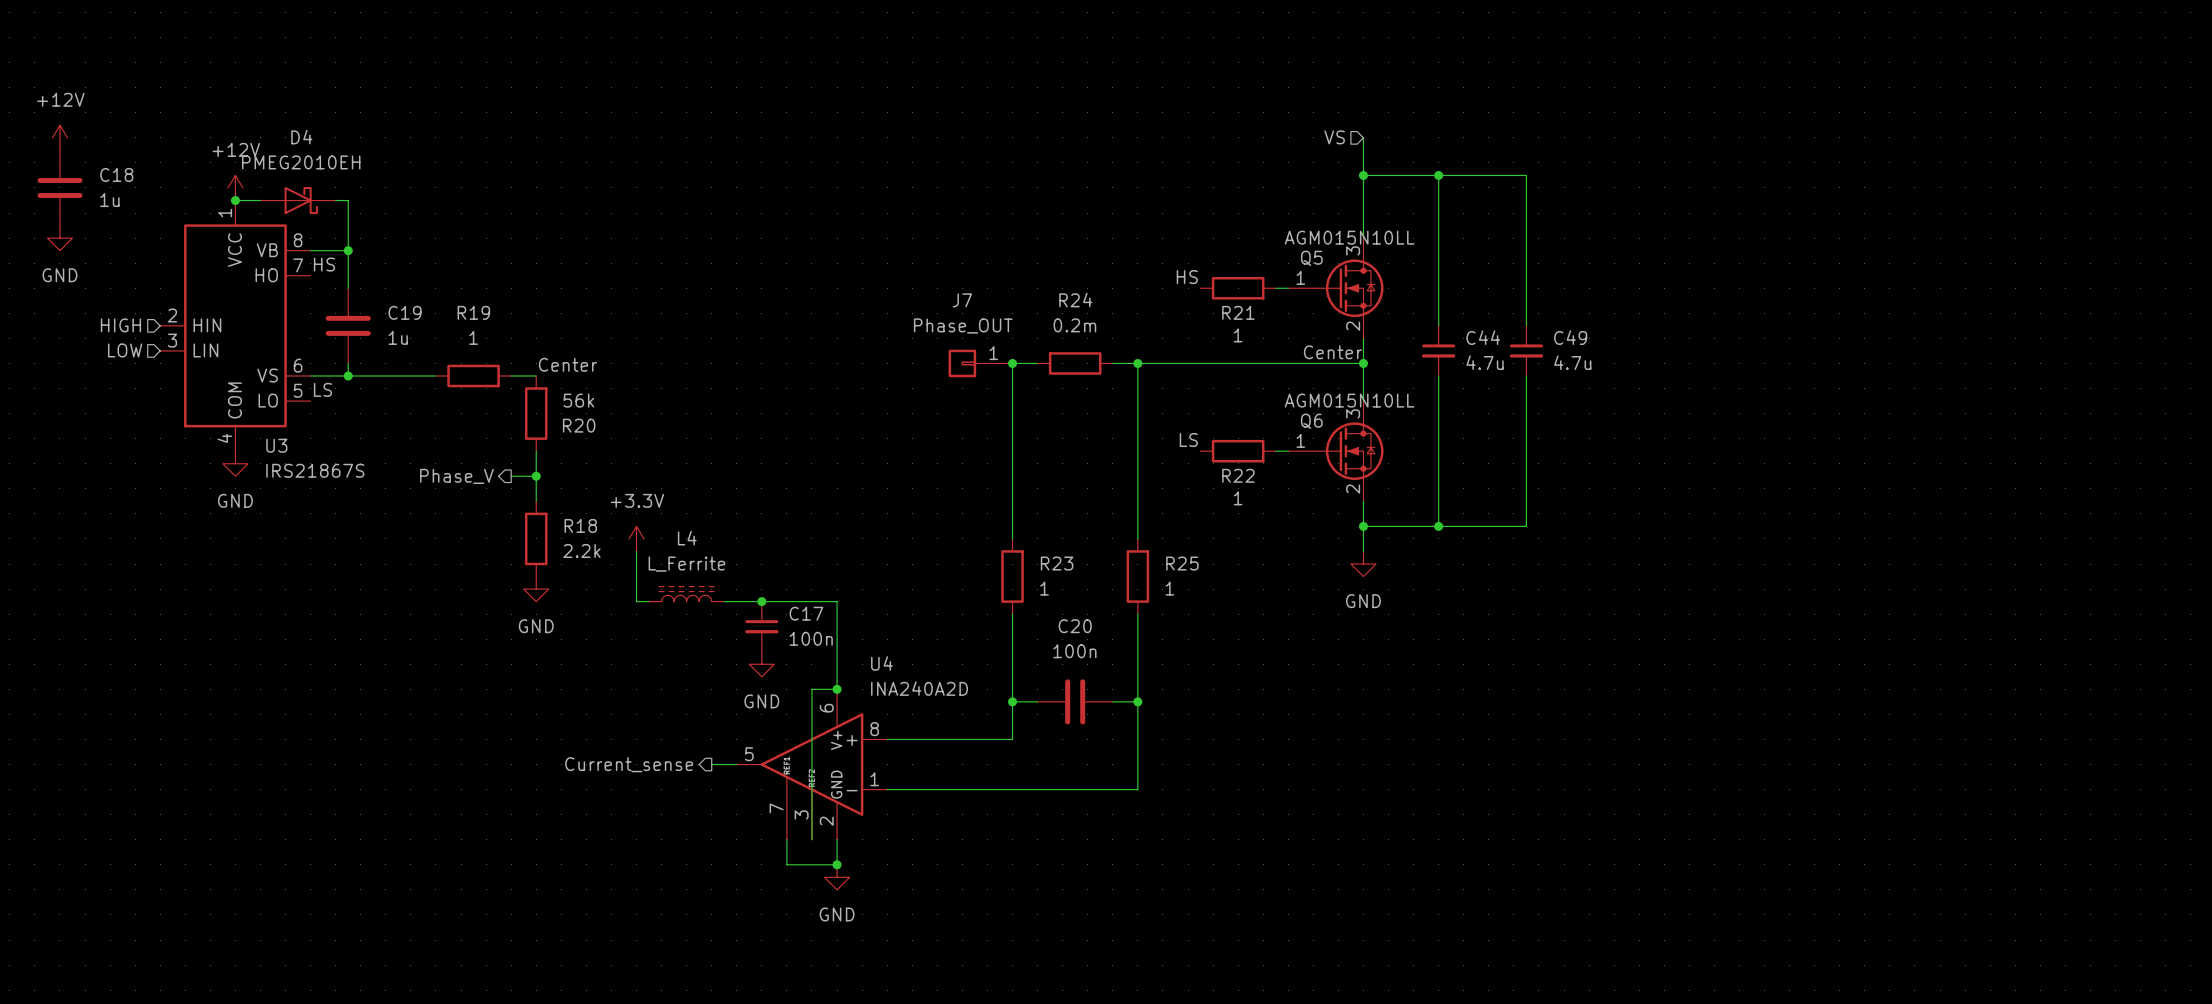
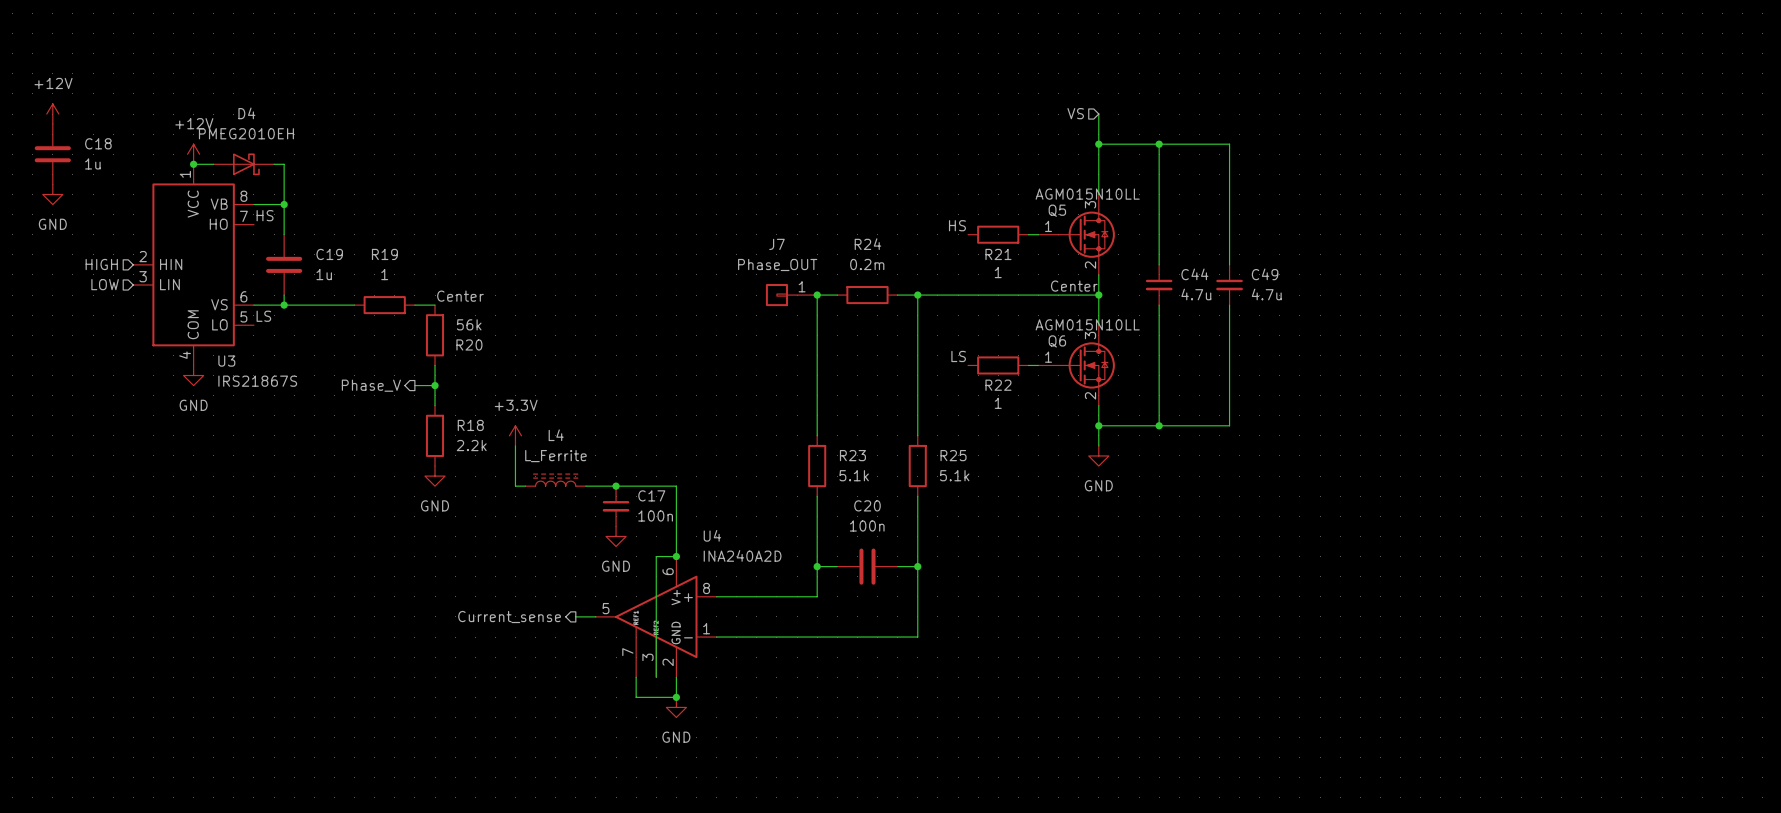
R23 value: 1 (1044, 588) -> 5.1k (854, 475)
R25 value: 1 (1169, 588) -> 5.1k (954, 475)

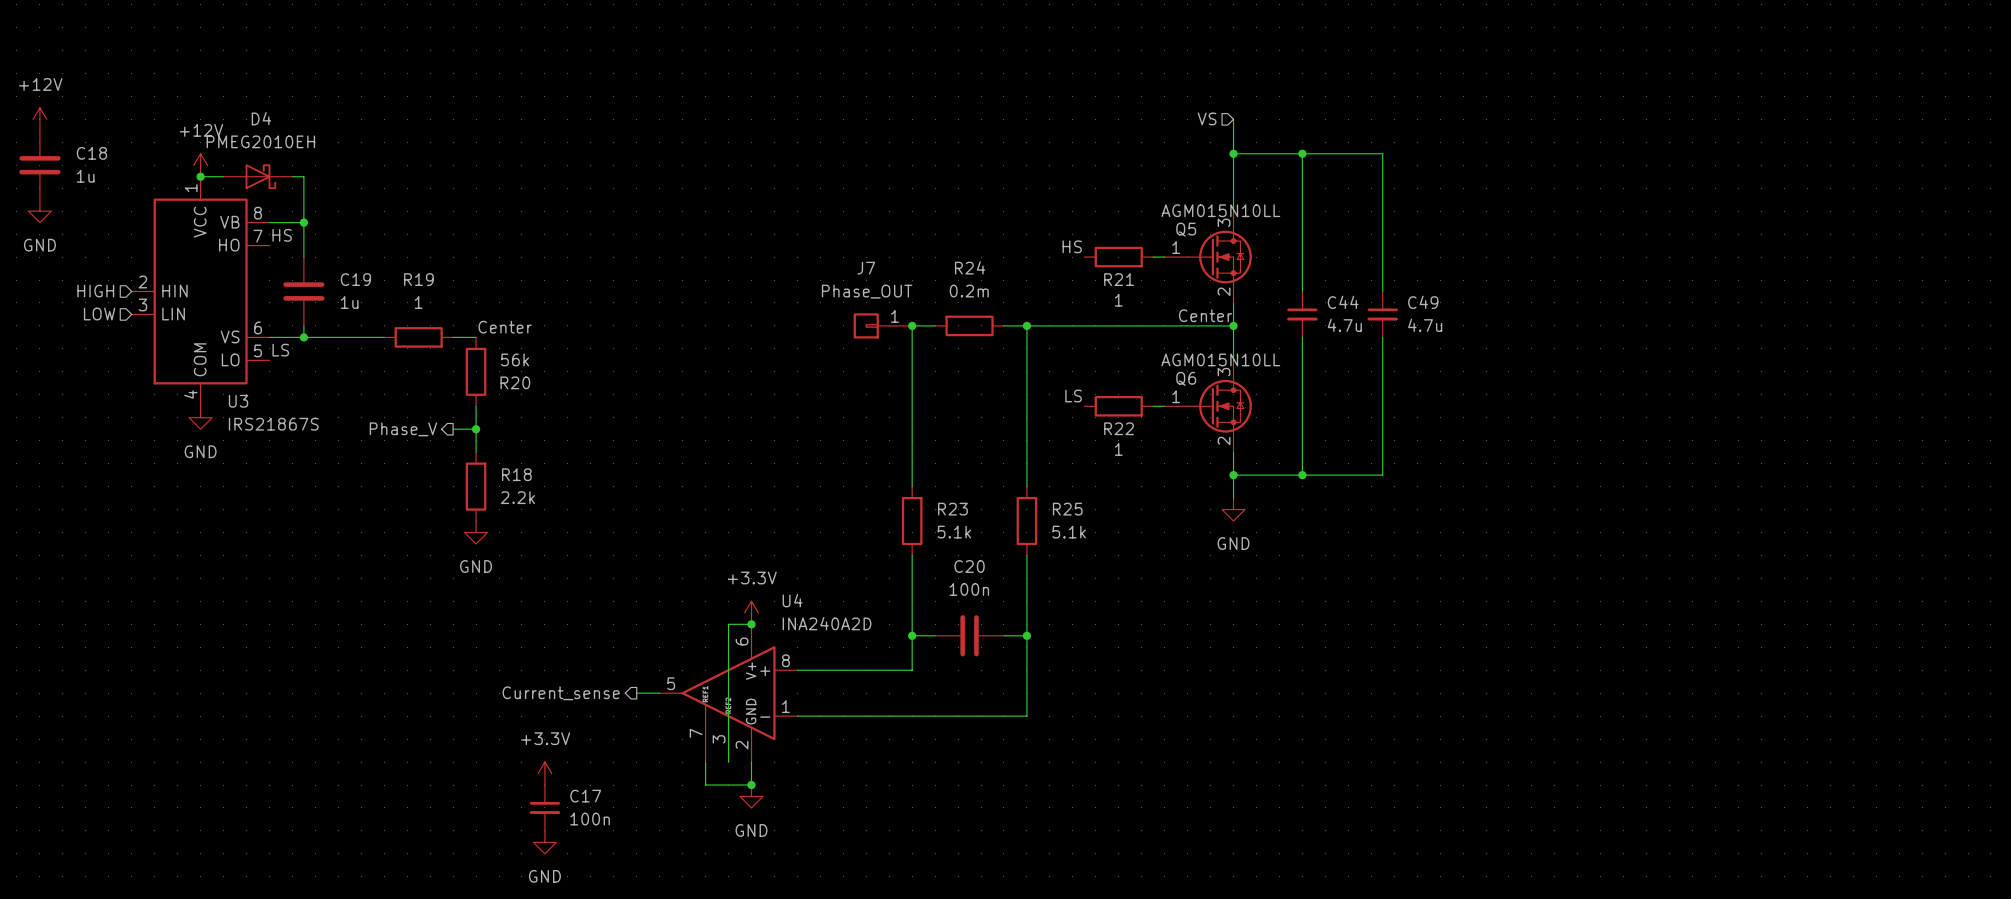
power symbol: +3.3V (515, 435) -> none
wire: (515, 445) (515, 486) (525, 486) -> none
L4: L_Ferrite (555, 480) -> none
wire: (585, 486) (676, 486) (676, 556) -> none
junction: (616, 486) -> none
C17 position: (616, 506) -> (544, 807)
power symbol: GND (616, 536) -> none
power symbol: none -> +3.3V (751, 612)
power symbol: none -> +3.3V (544, 773)
power symbol: none -> GND (544, 842)

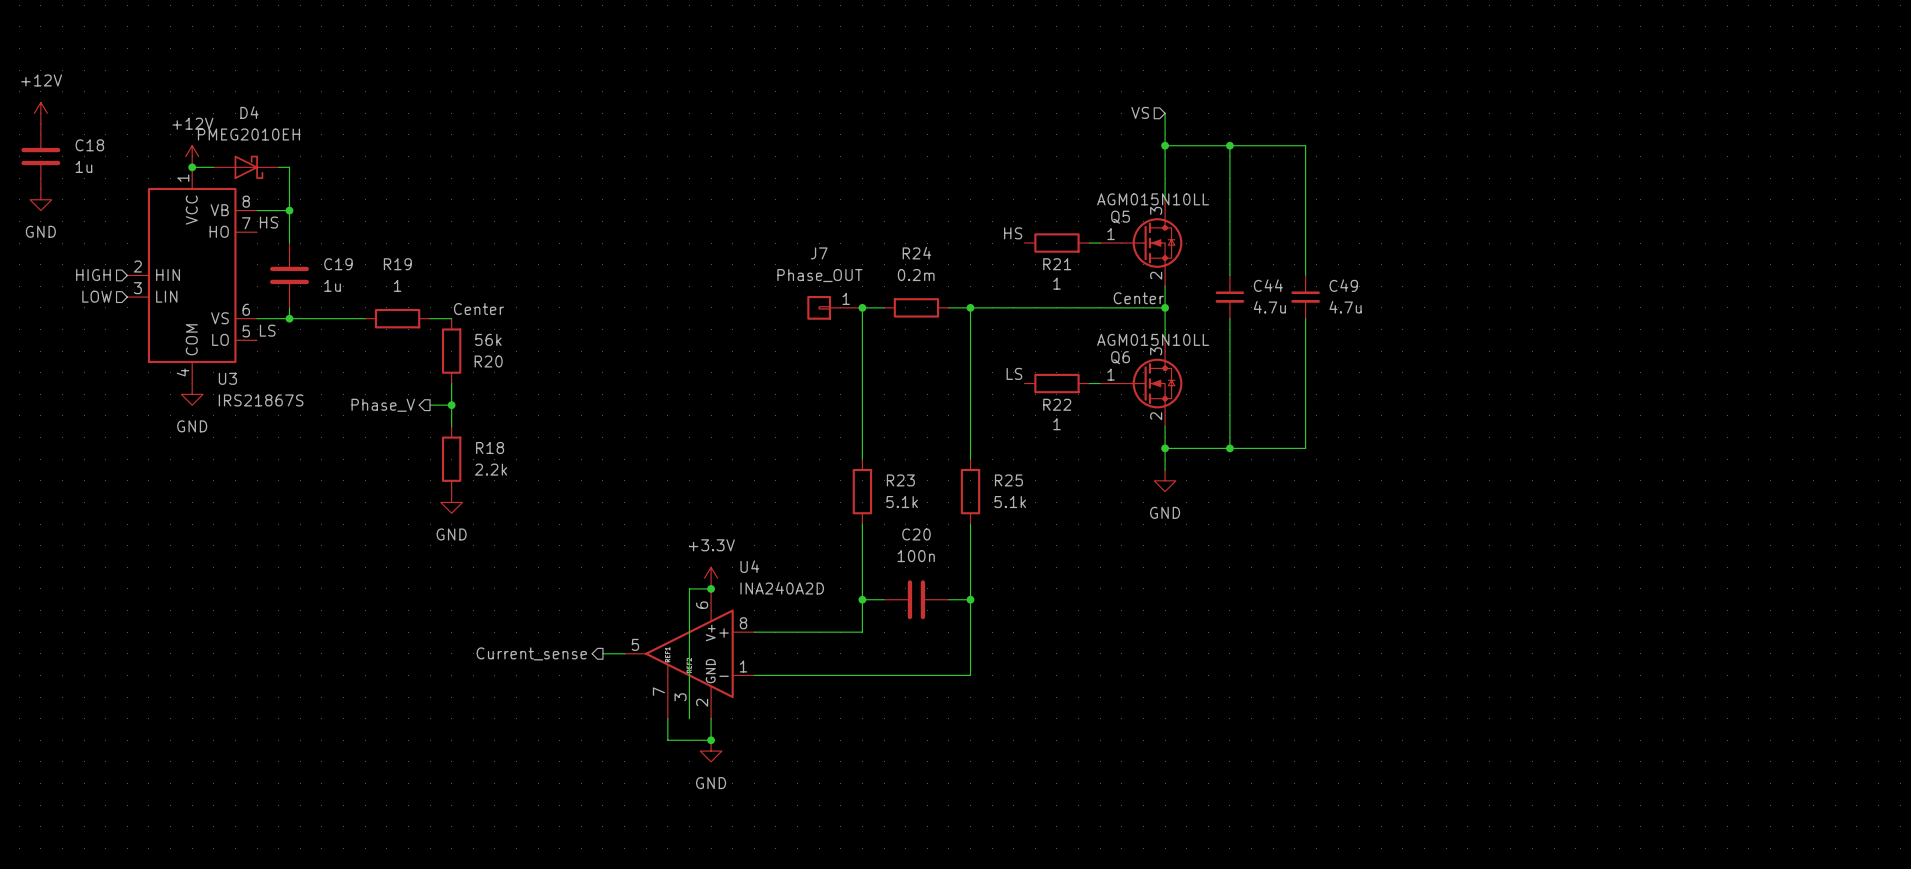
power symbol: +3.3V (544, 773) -> none
C17: 100n (544, 807) -> none
power symbol: GND (544, 842) -> none

